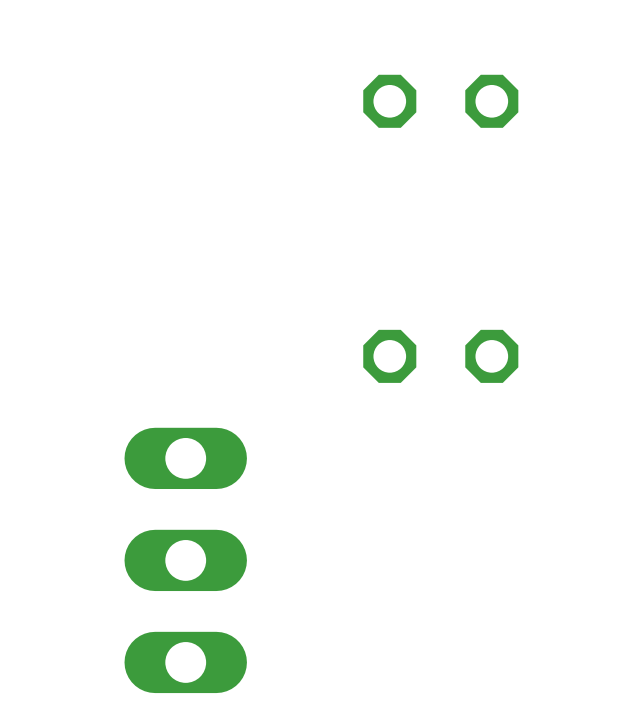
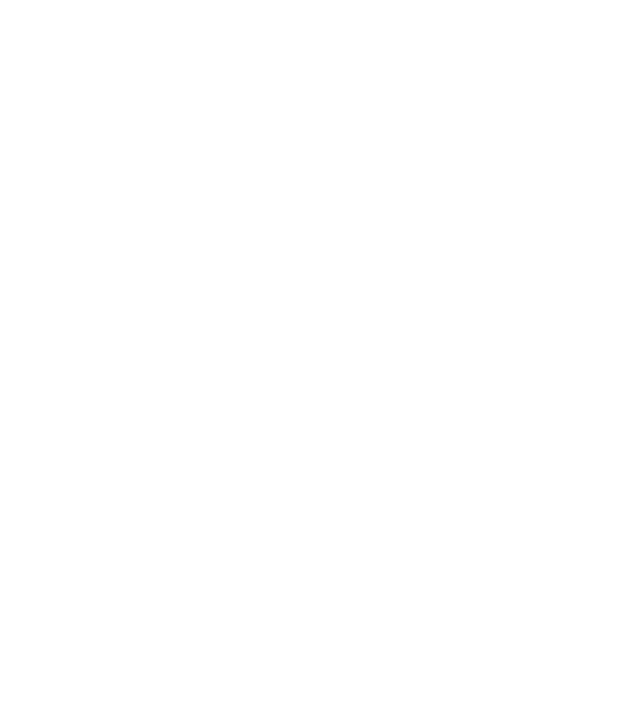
part: (440, 101) -> none
part: (440, 356) -> none
part: (185, 560) -> none

